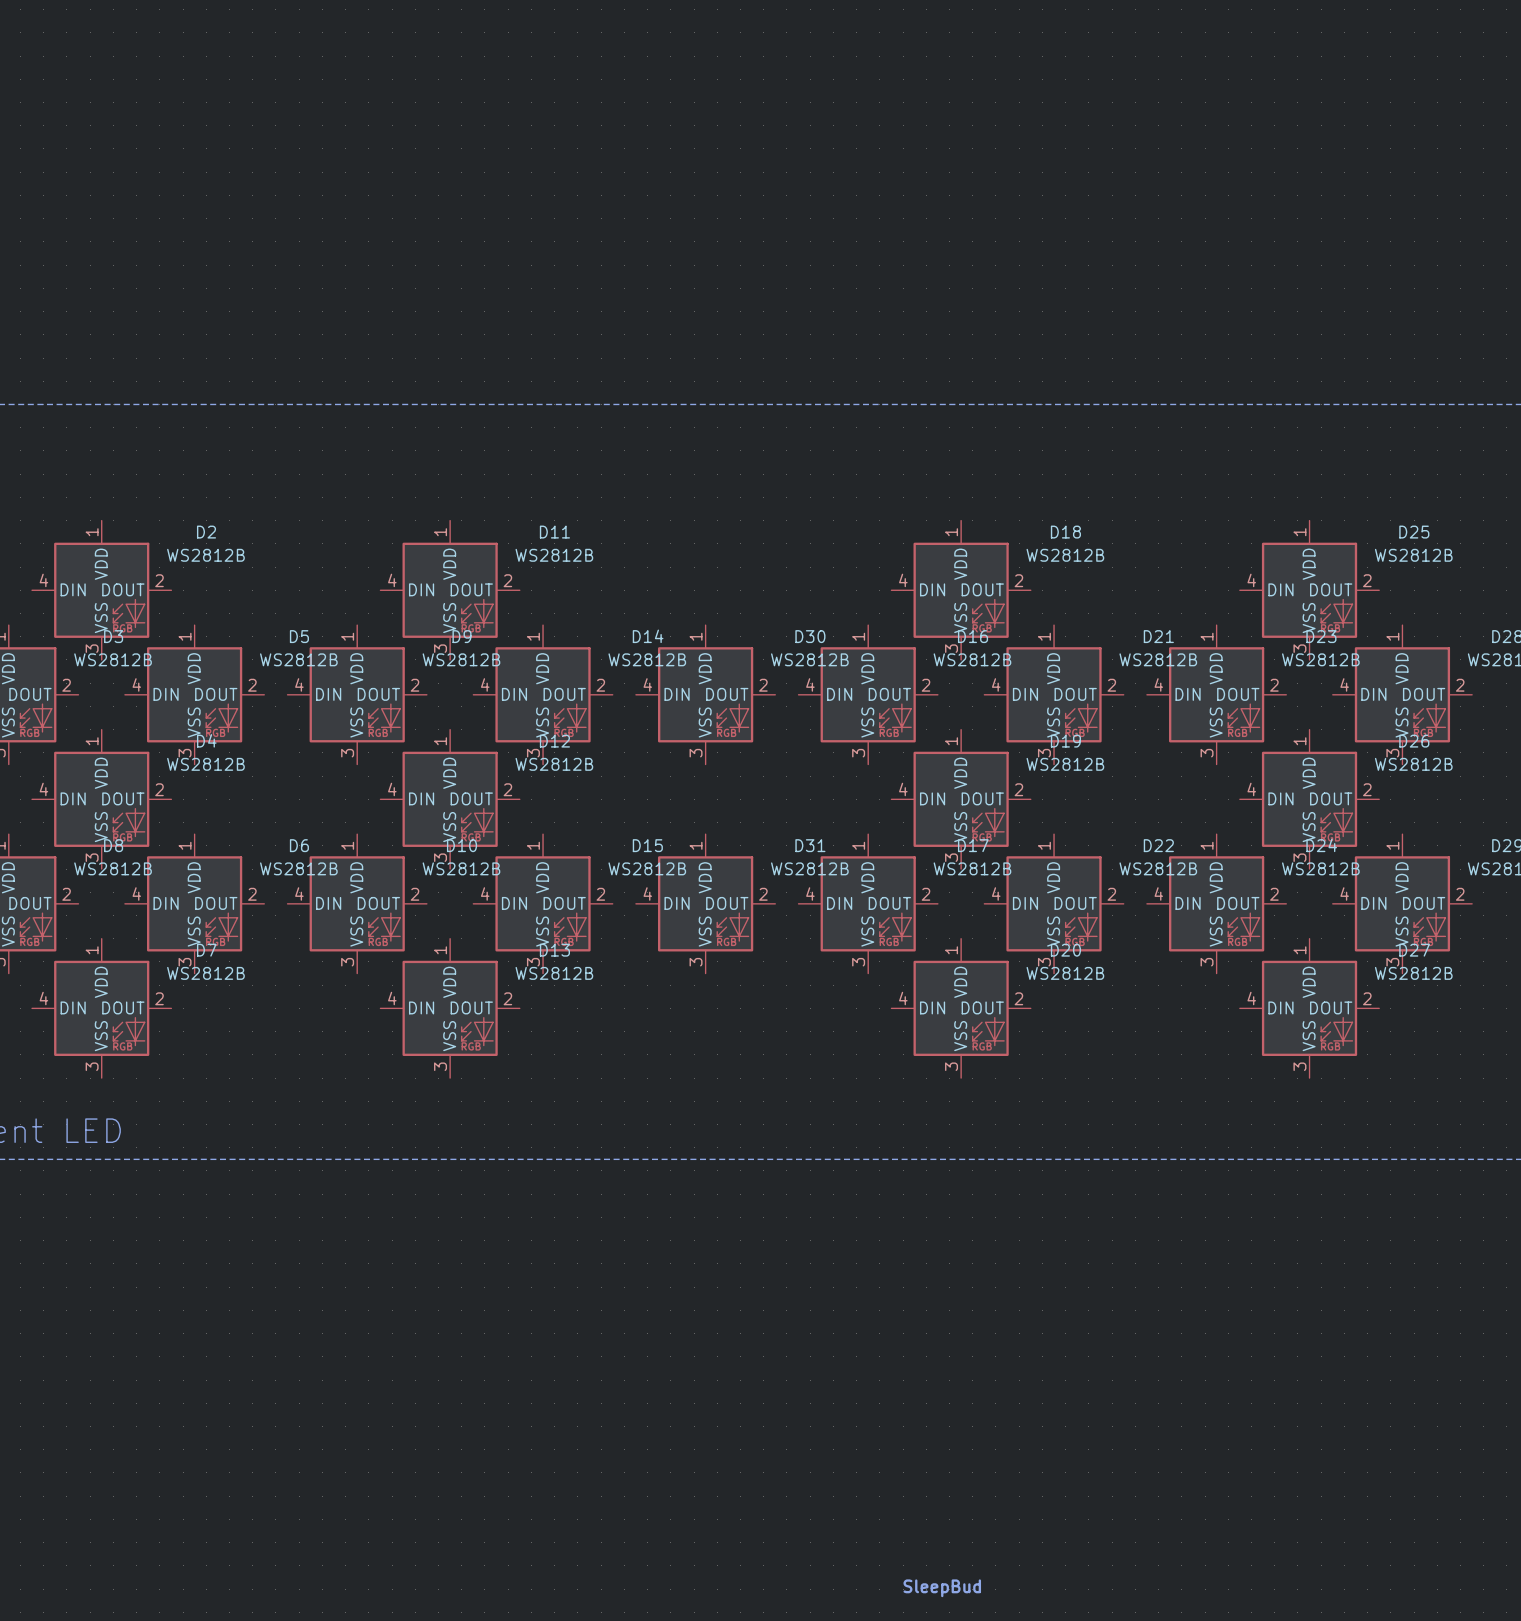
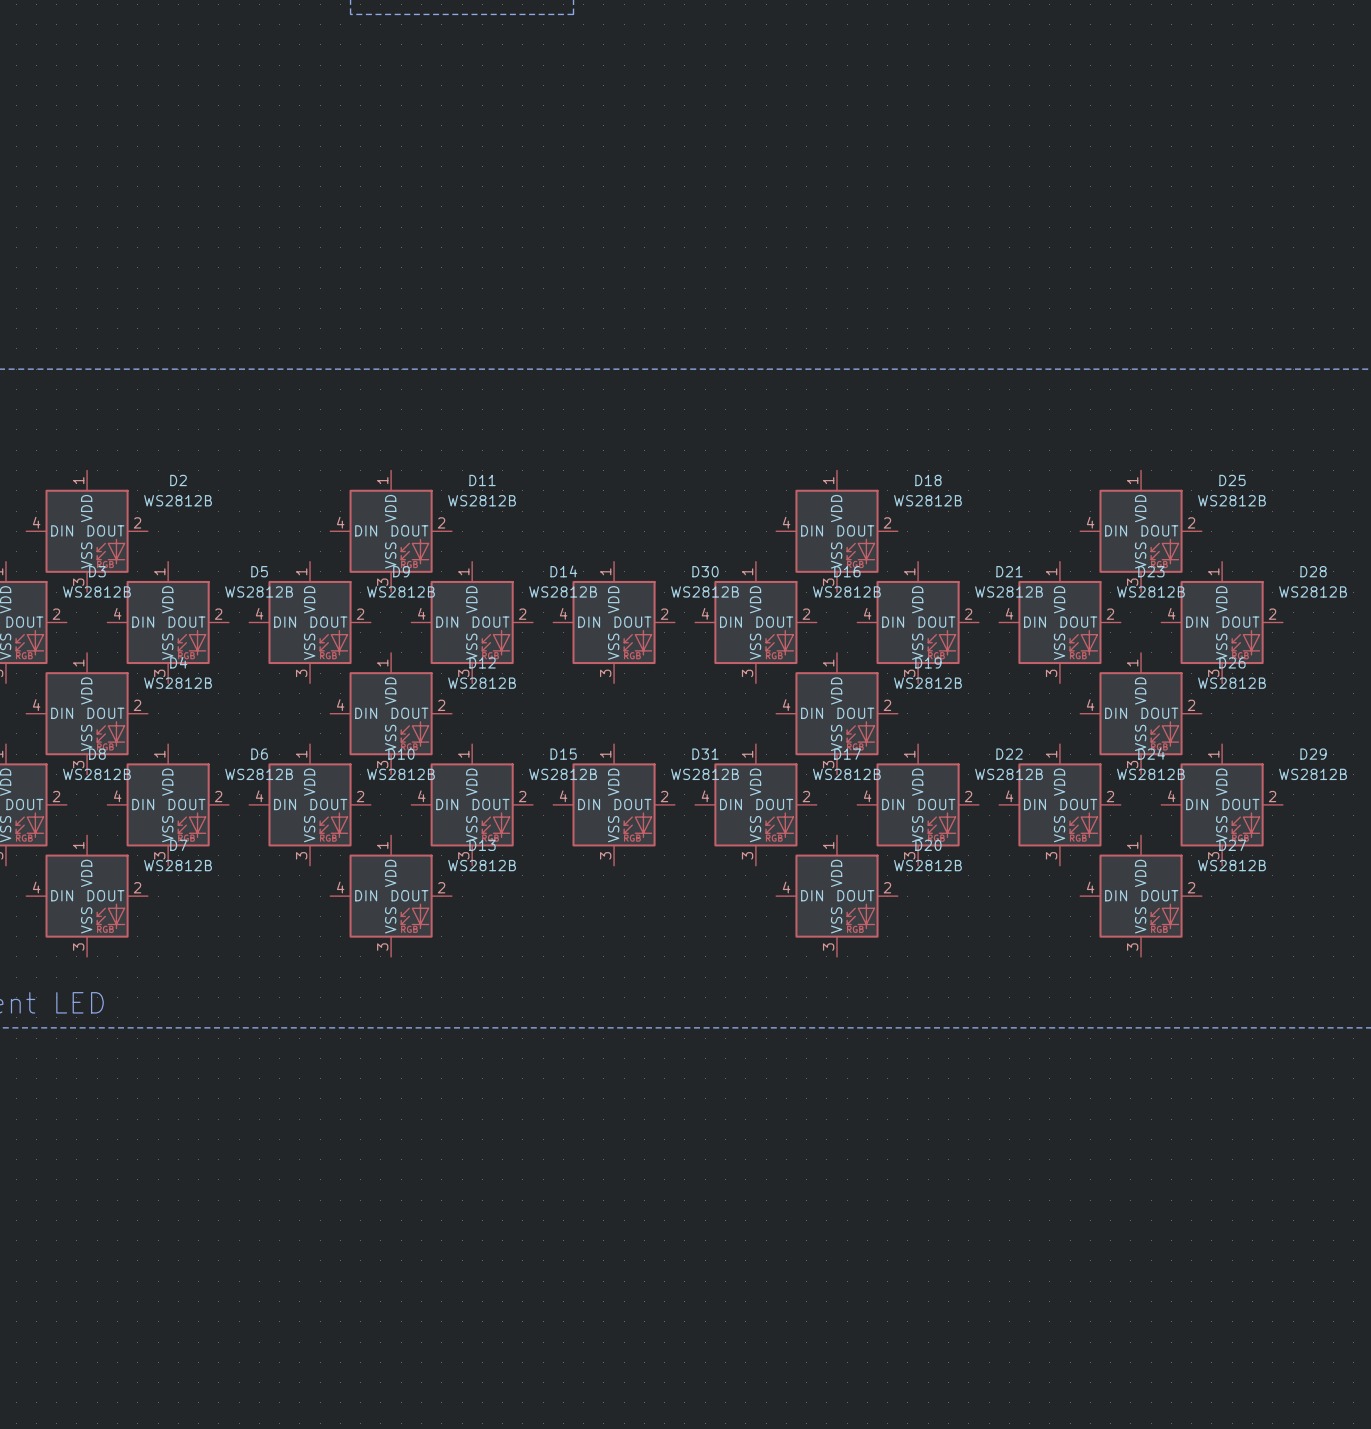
text: SleepBud (942, 1588) -> none

